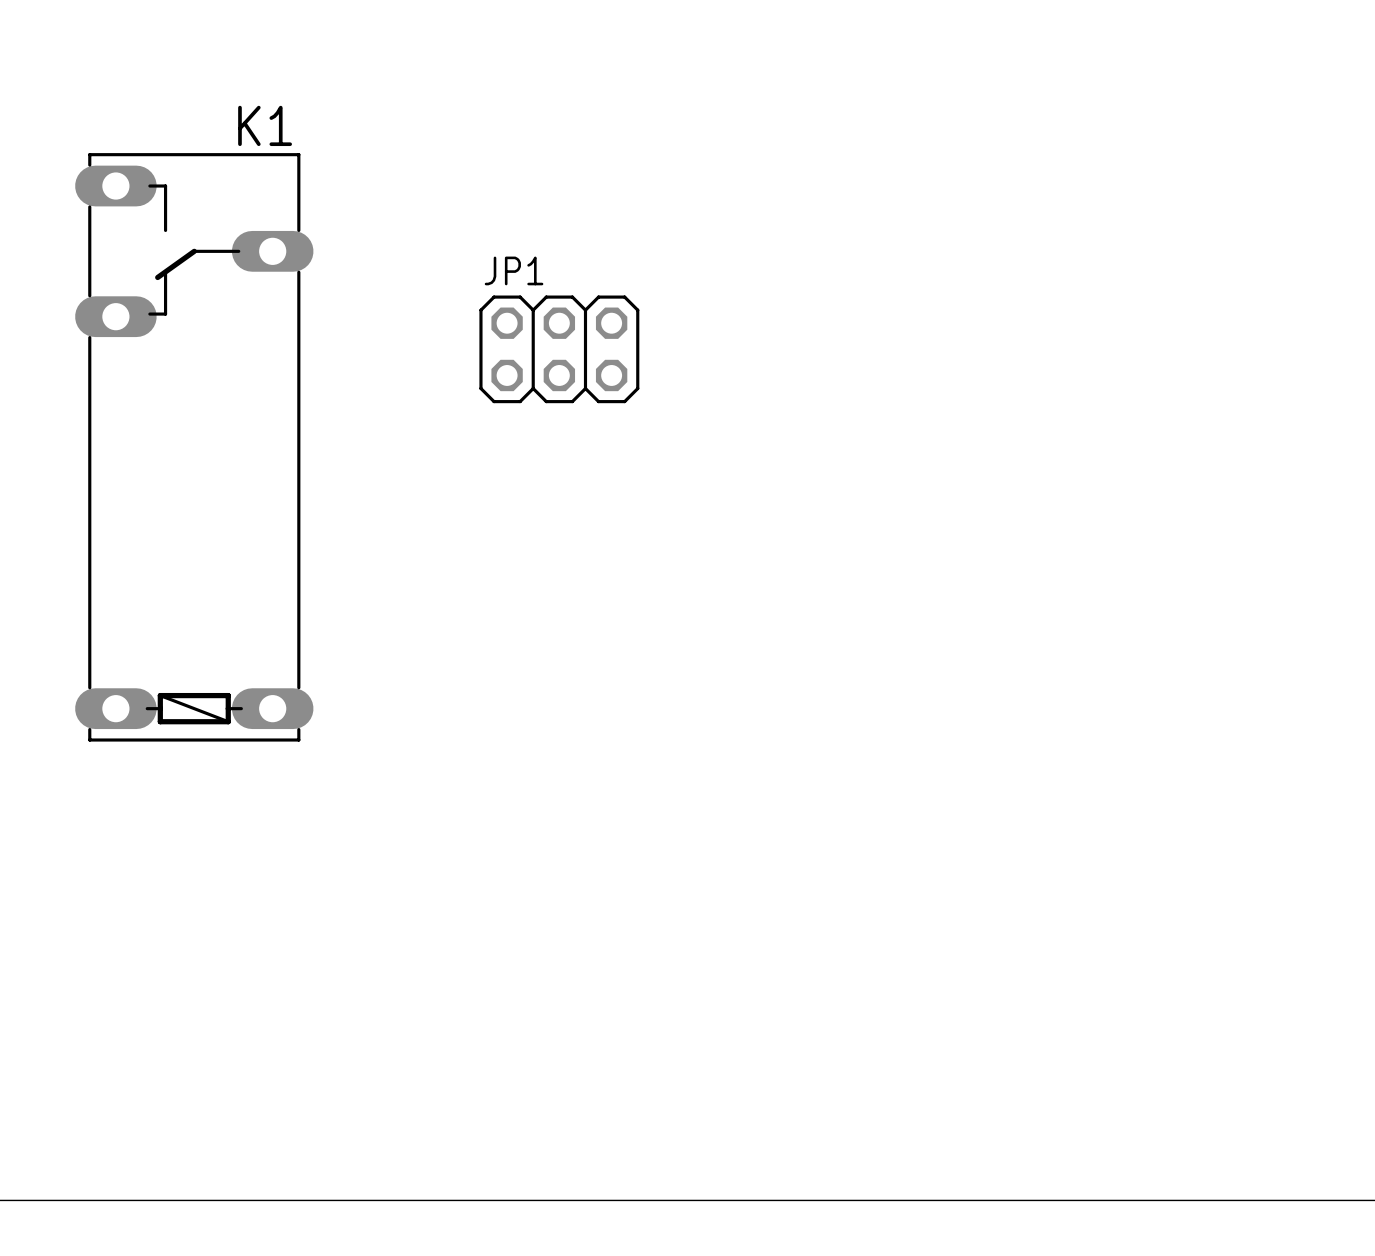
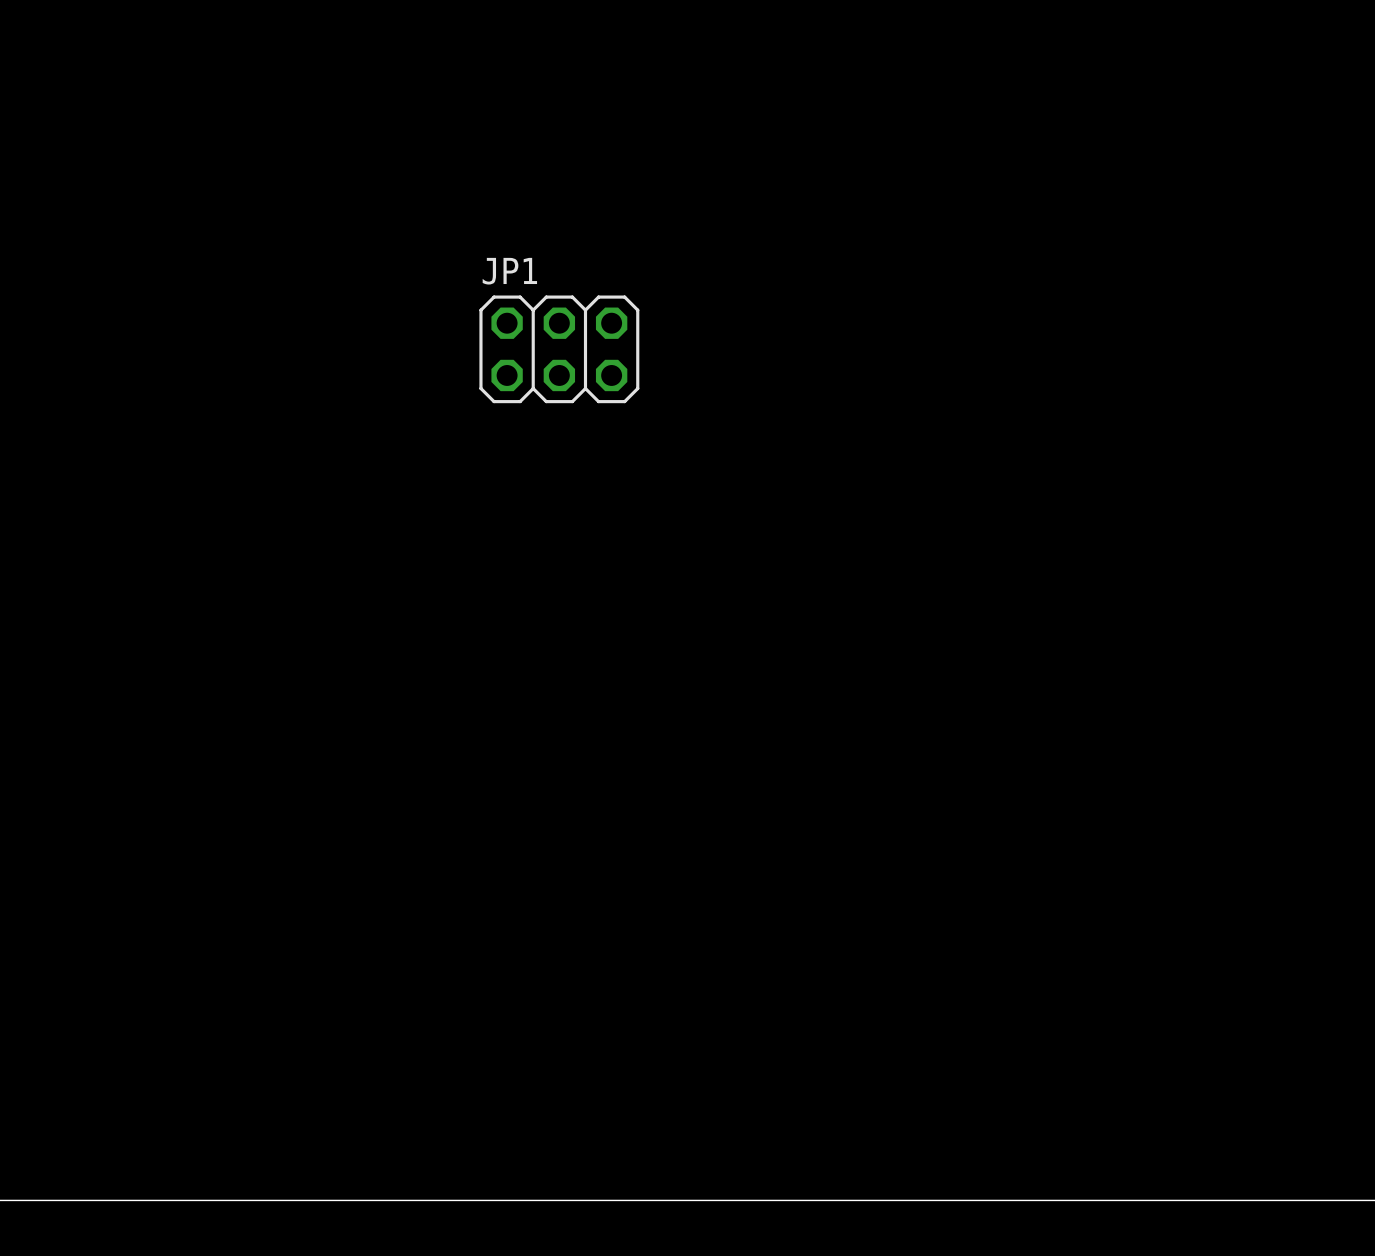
K1: (194, 447) -> none

